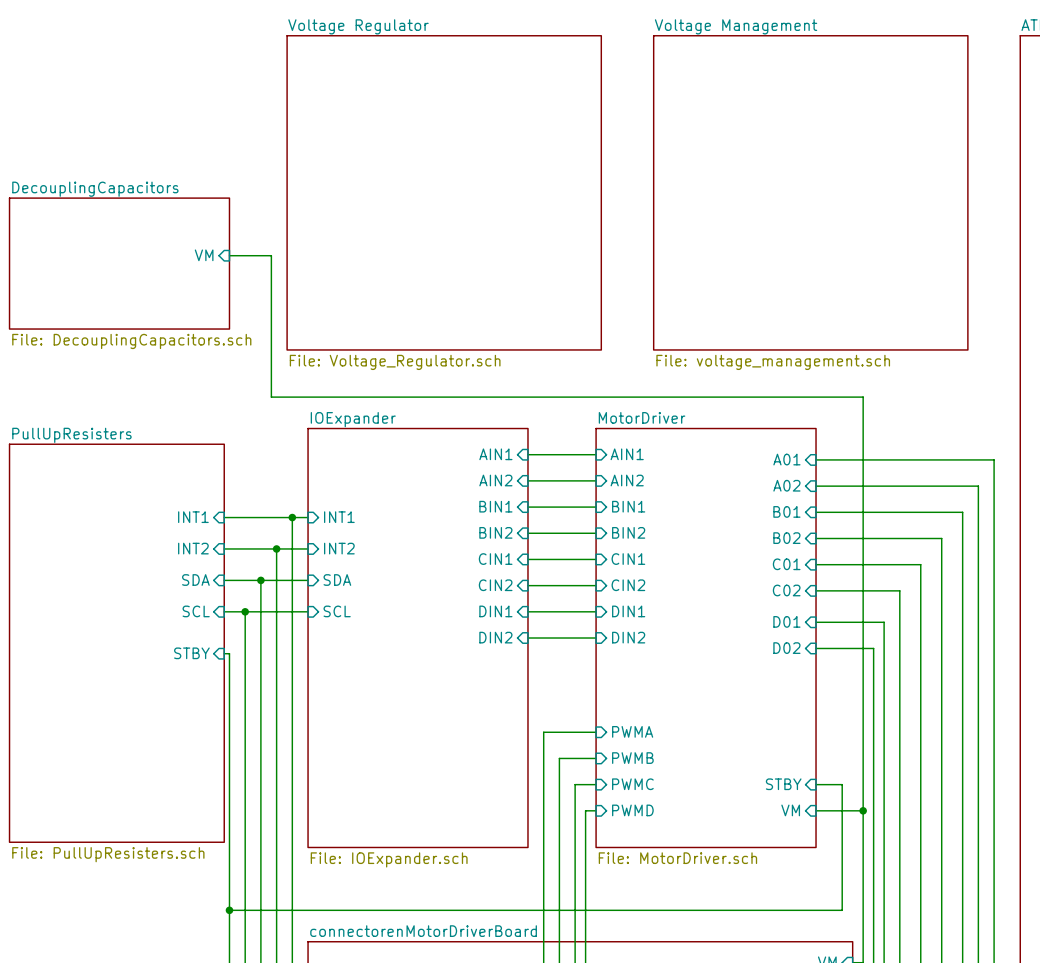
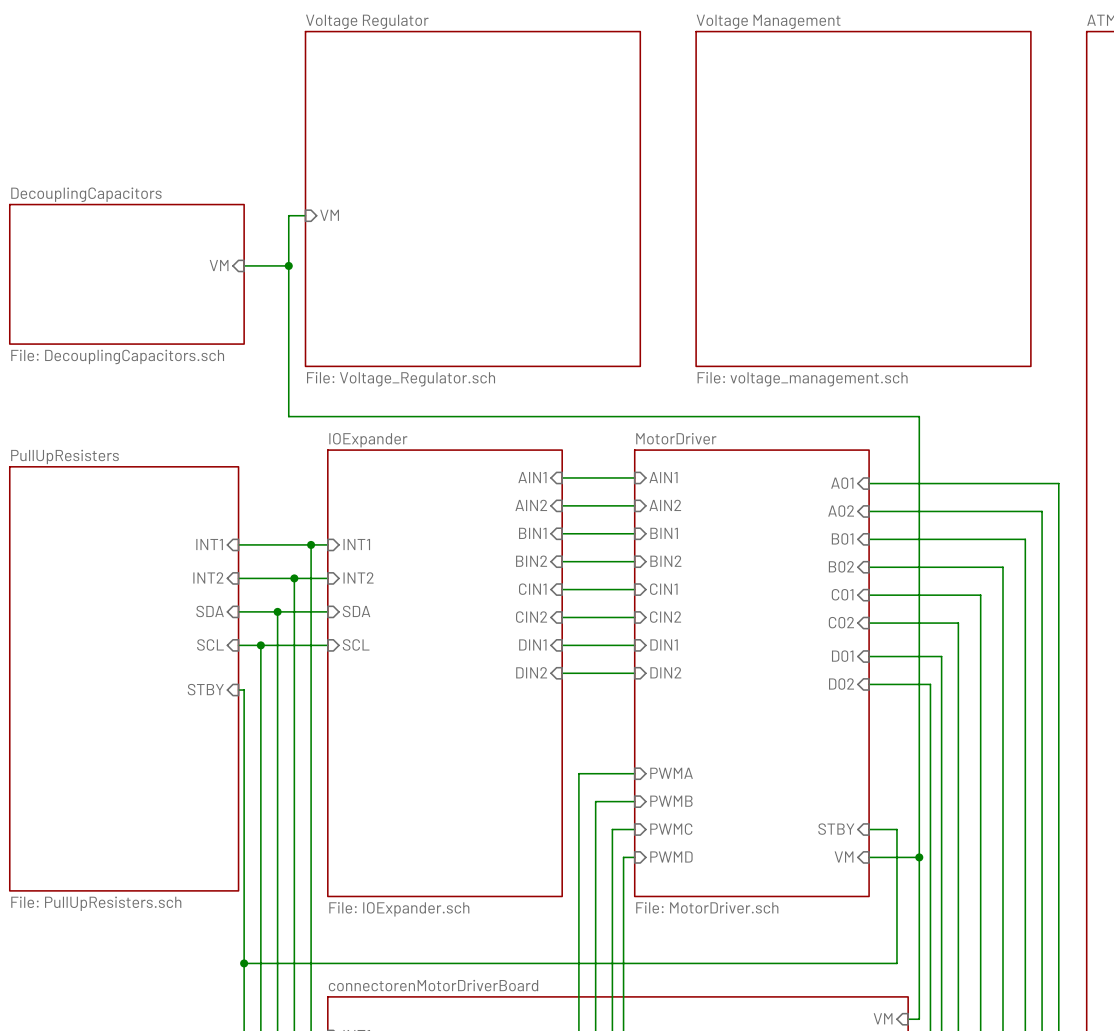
wire: none -> (305, 215) (288, 215) (288, 265)
sheet pin: none -> VM (329, 215)
junction: none -> (288, 265)

